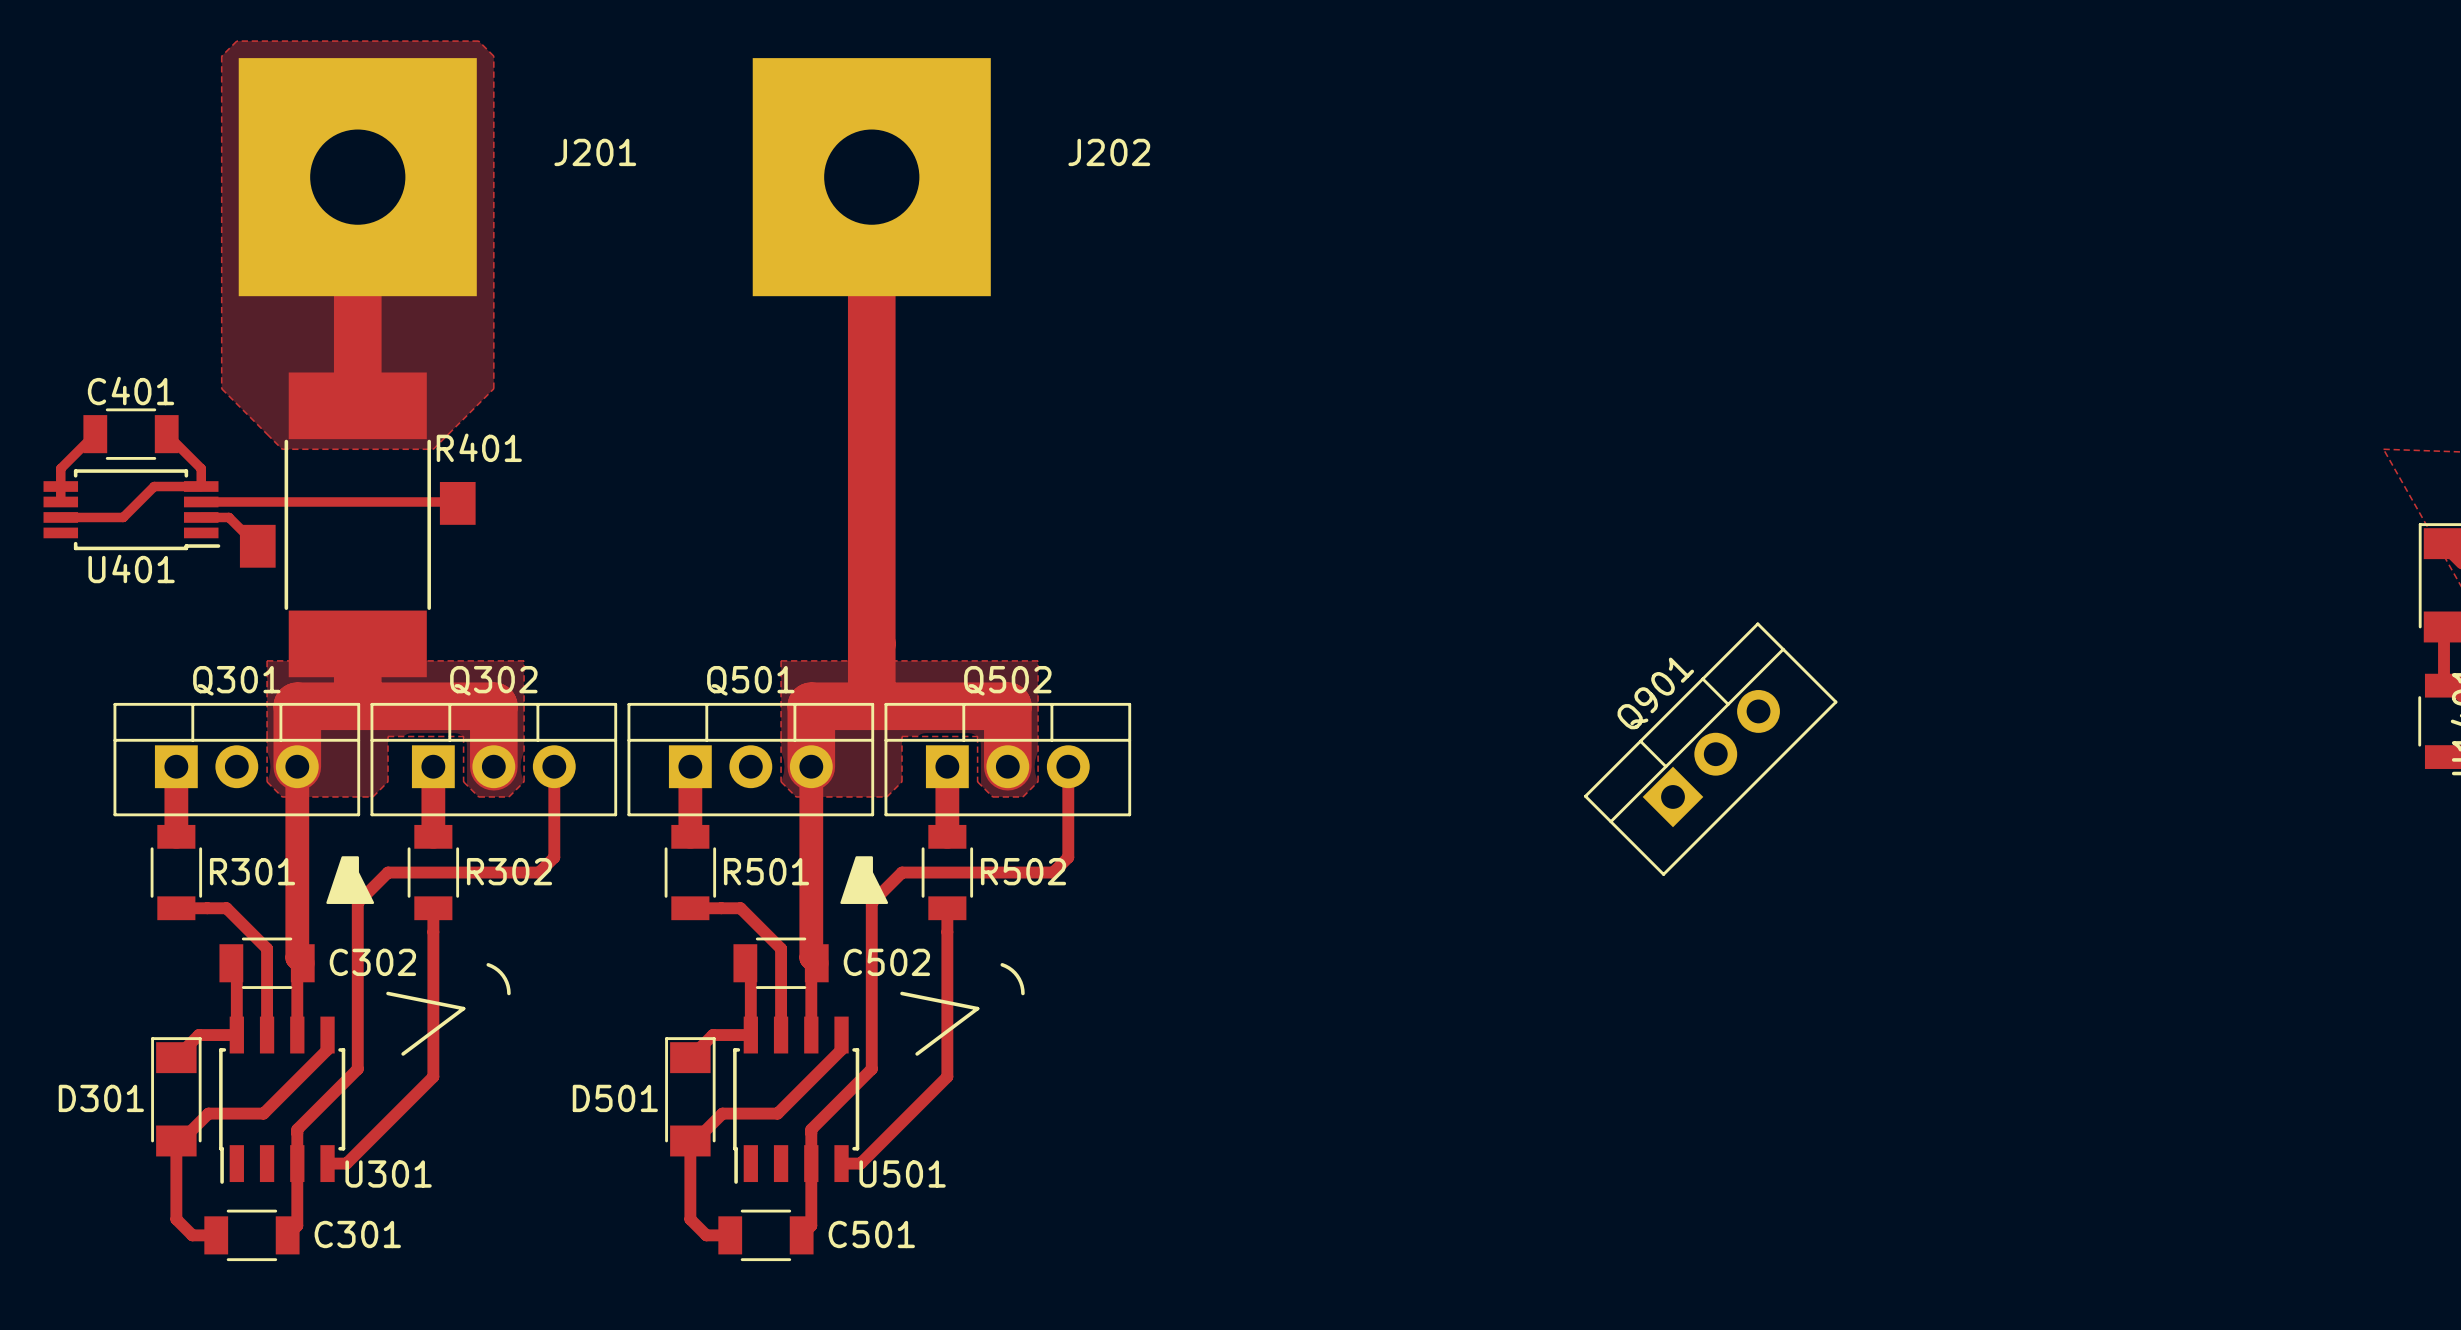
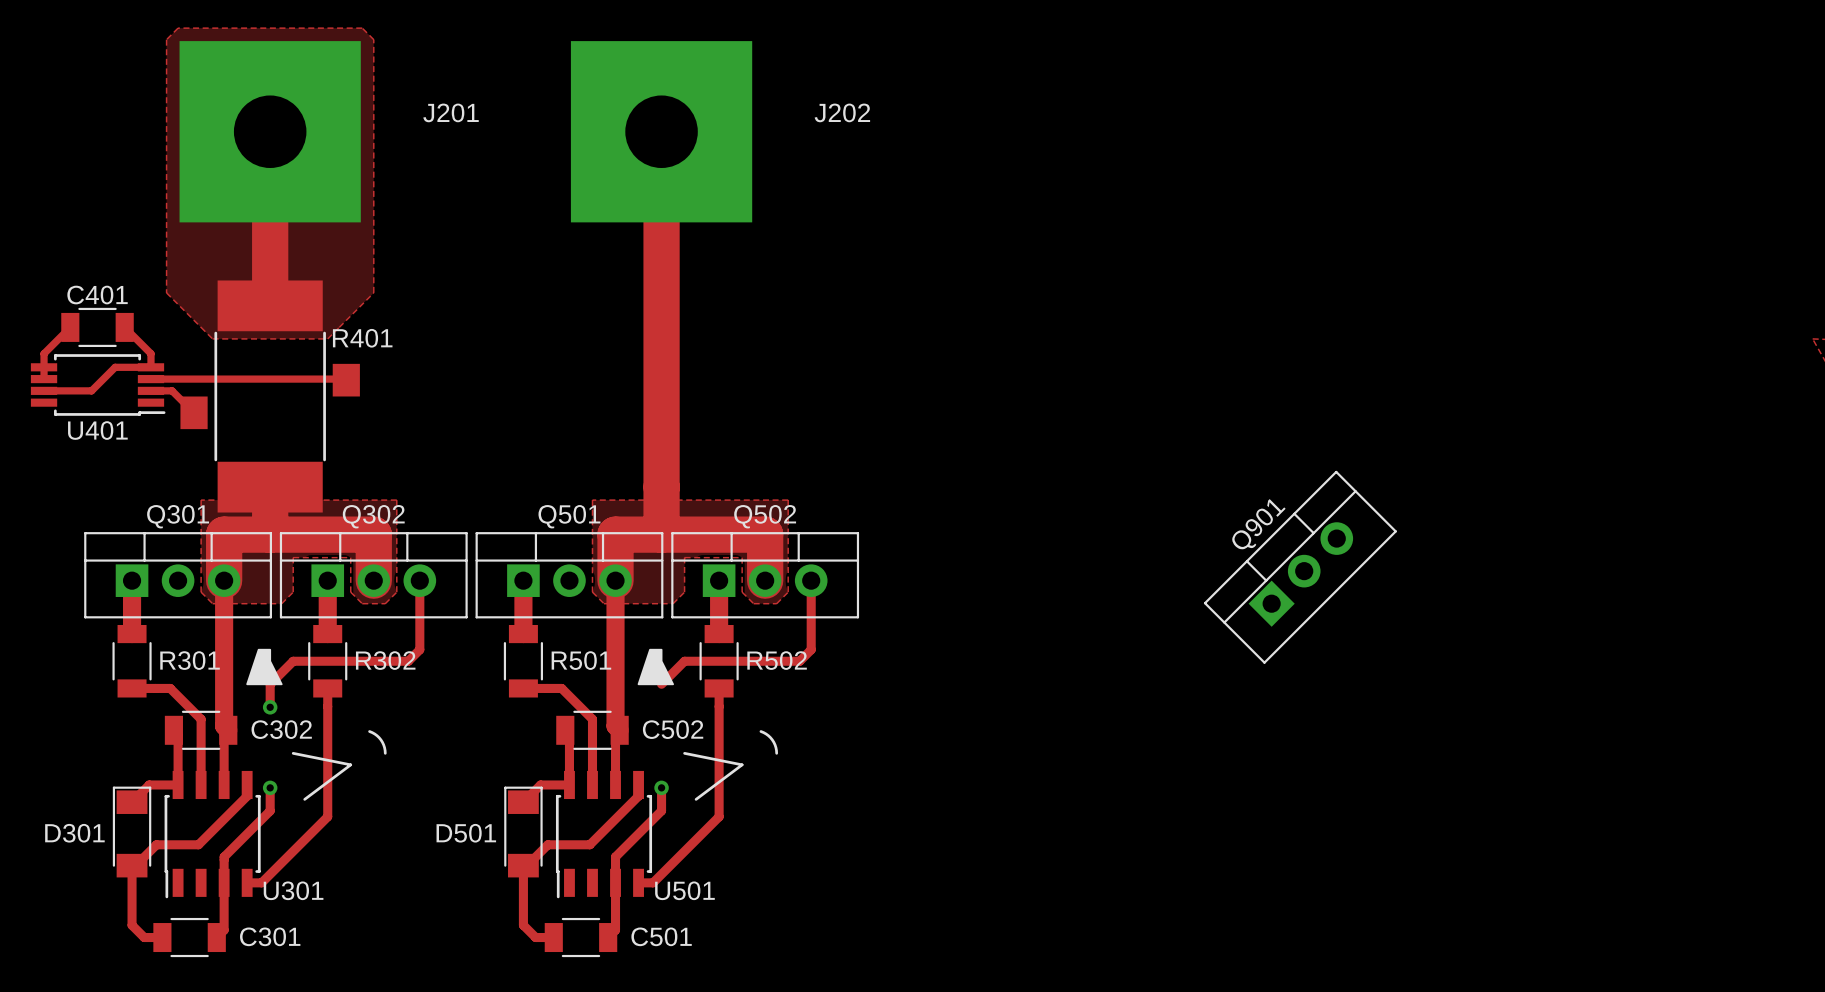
track: (871, 902) (871, 1038) -> none
track: (357, 933) (357, 1038) -> none
via: none -> (270, 707)
via: none -> (270, 787)
via: none -> (661, 787)

